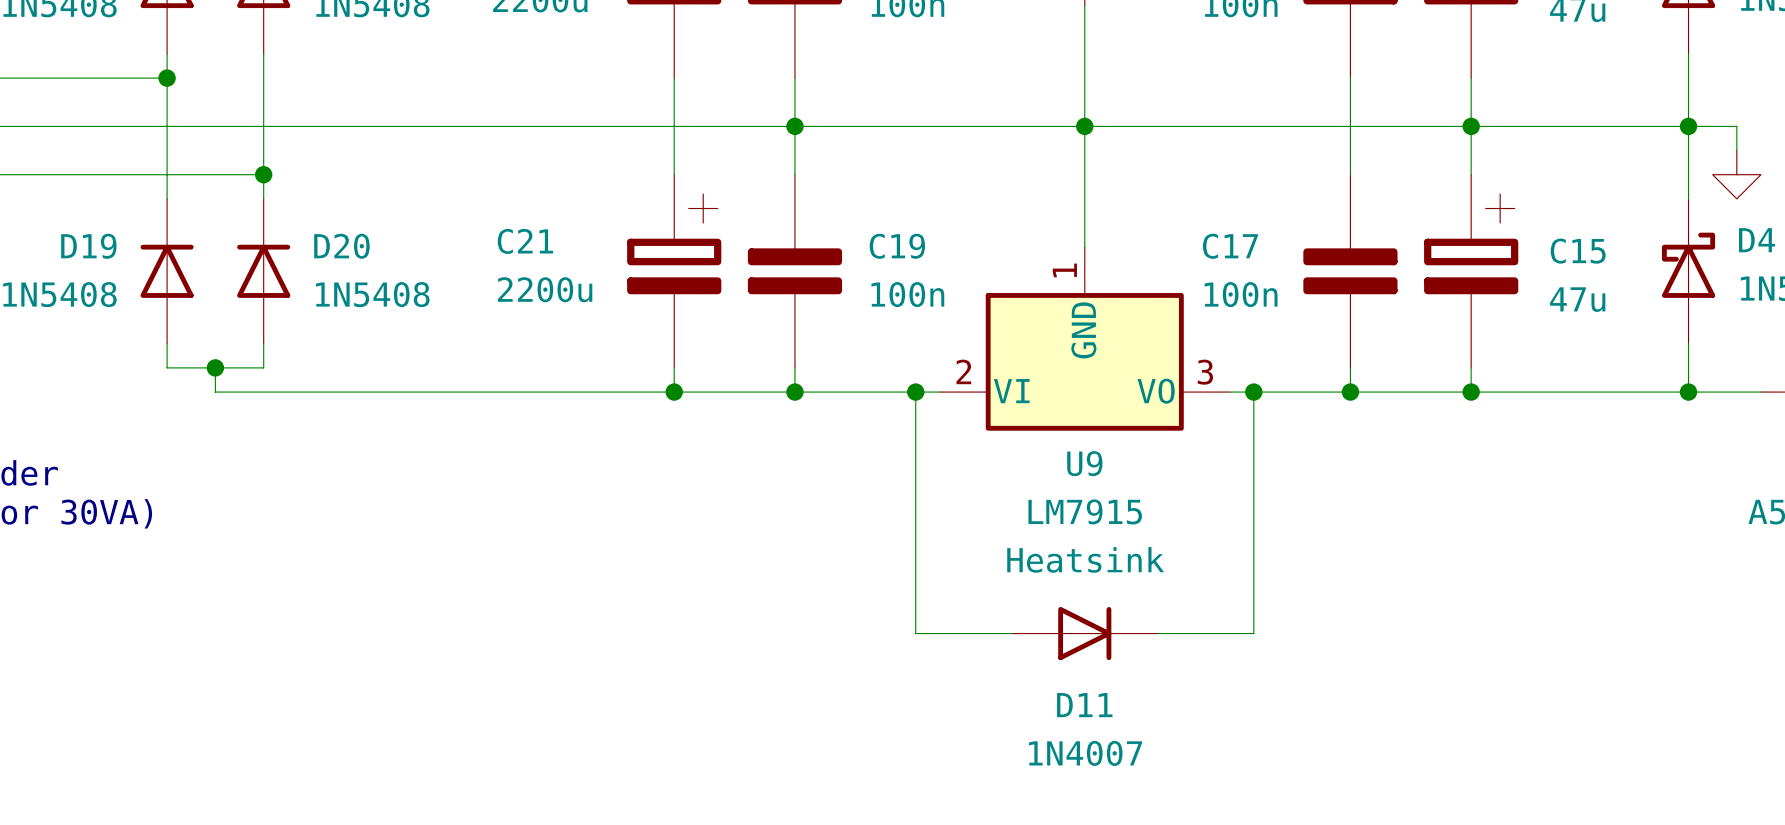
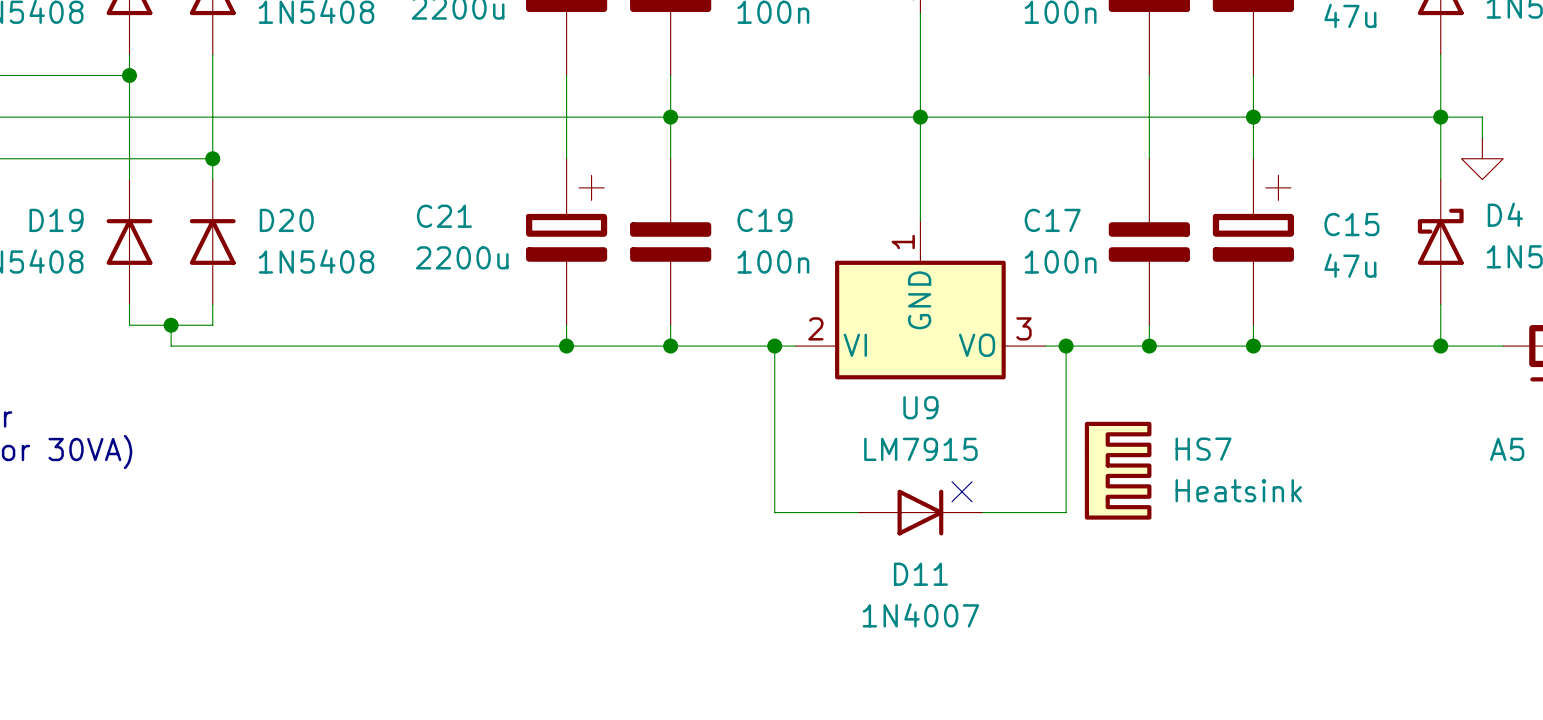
HS7: none -> Heatsink (1118, 470)
U9 text: Heatsink (1085, 559) -> none
no-connect mark: none -> (962, 491)
wire: (915, 585) (915, 633) (1012, 633) -> (774, 512) (857, 512)
wire: (1253, 585) (1253, 633) (1157, 633) -> (1066, 512) (982, 512)
D11 position: (1084, 633) -> (920, 512)

